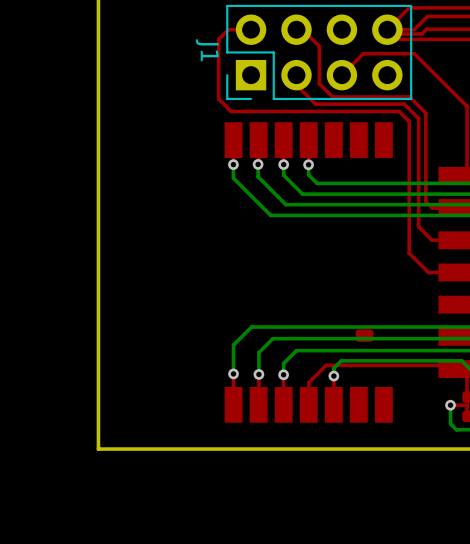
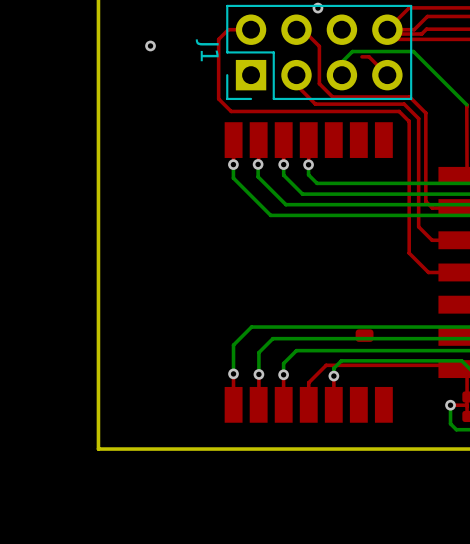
via: none -> (317, 8)
via: none -> (150, 45)
top track: none -> (362, 56) (369, 56) (387, 75)
top track: (341, 75) (363, 53) (414, 53) (467, 106) (467, 175) -> (467, 106) (466, 104) (467, 175)
bottom track: none -> (341, 75) (341, 62) (352, 51) (413, 51) (466, 104)

